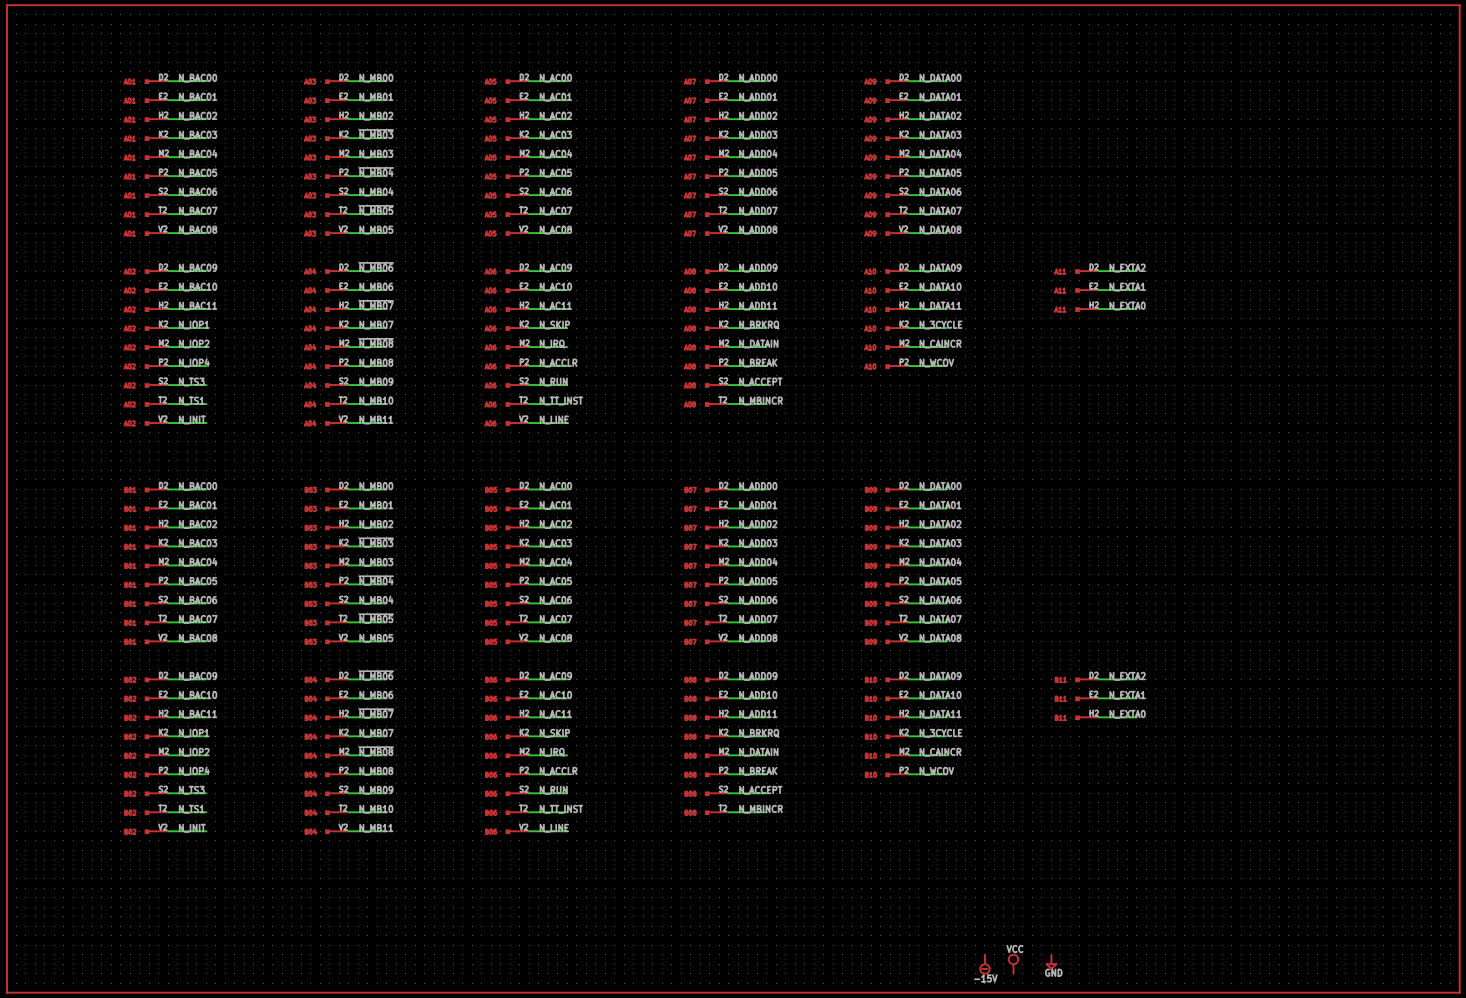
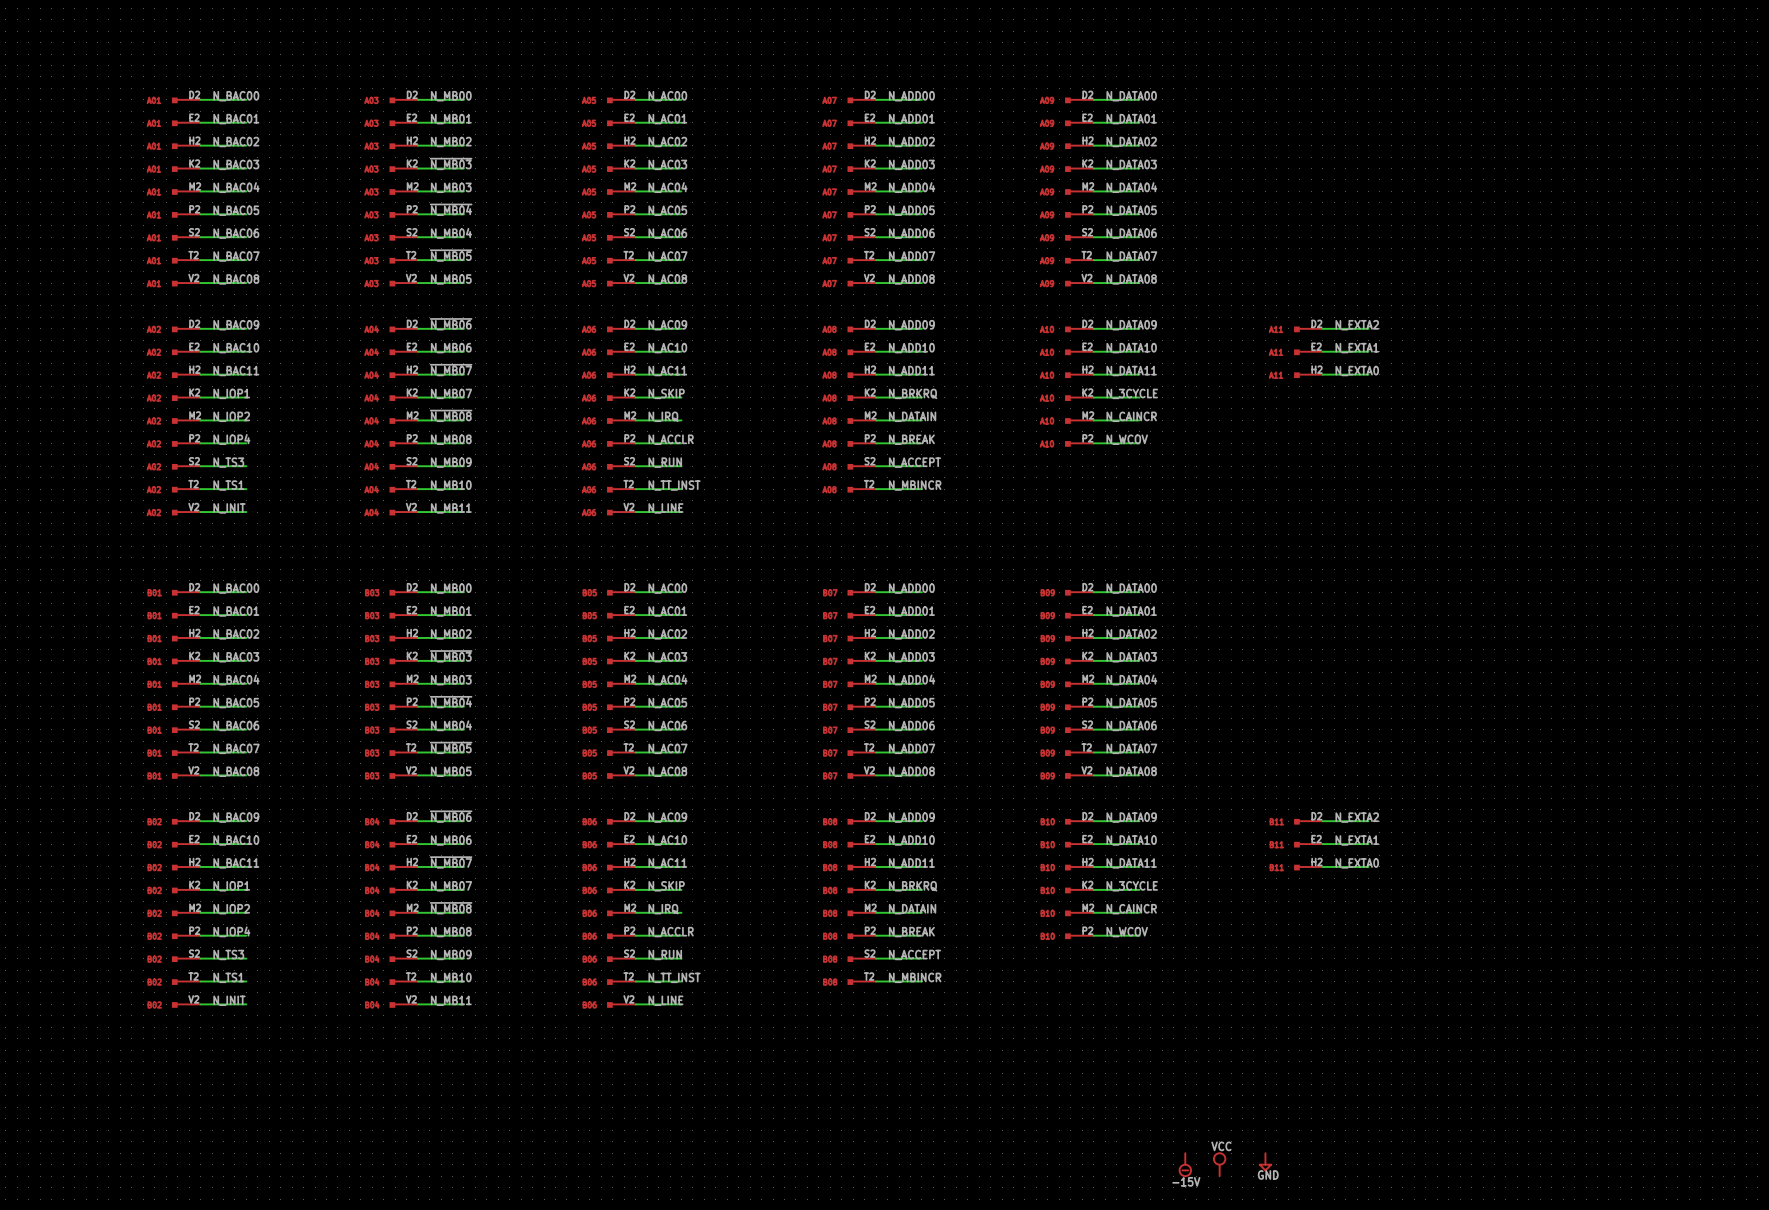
part: (733, 498) -> none

